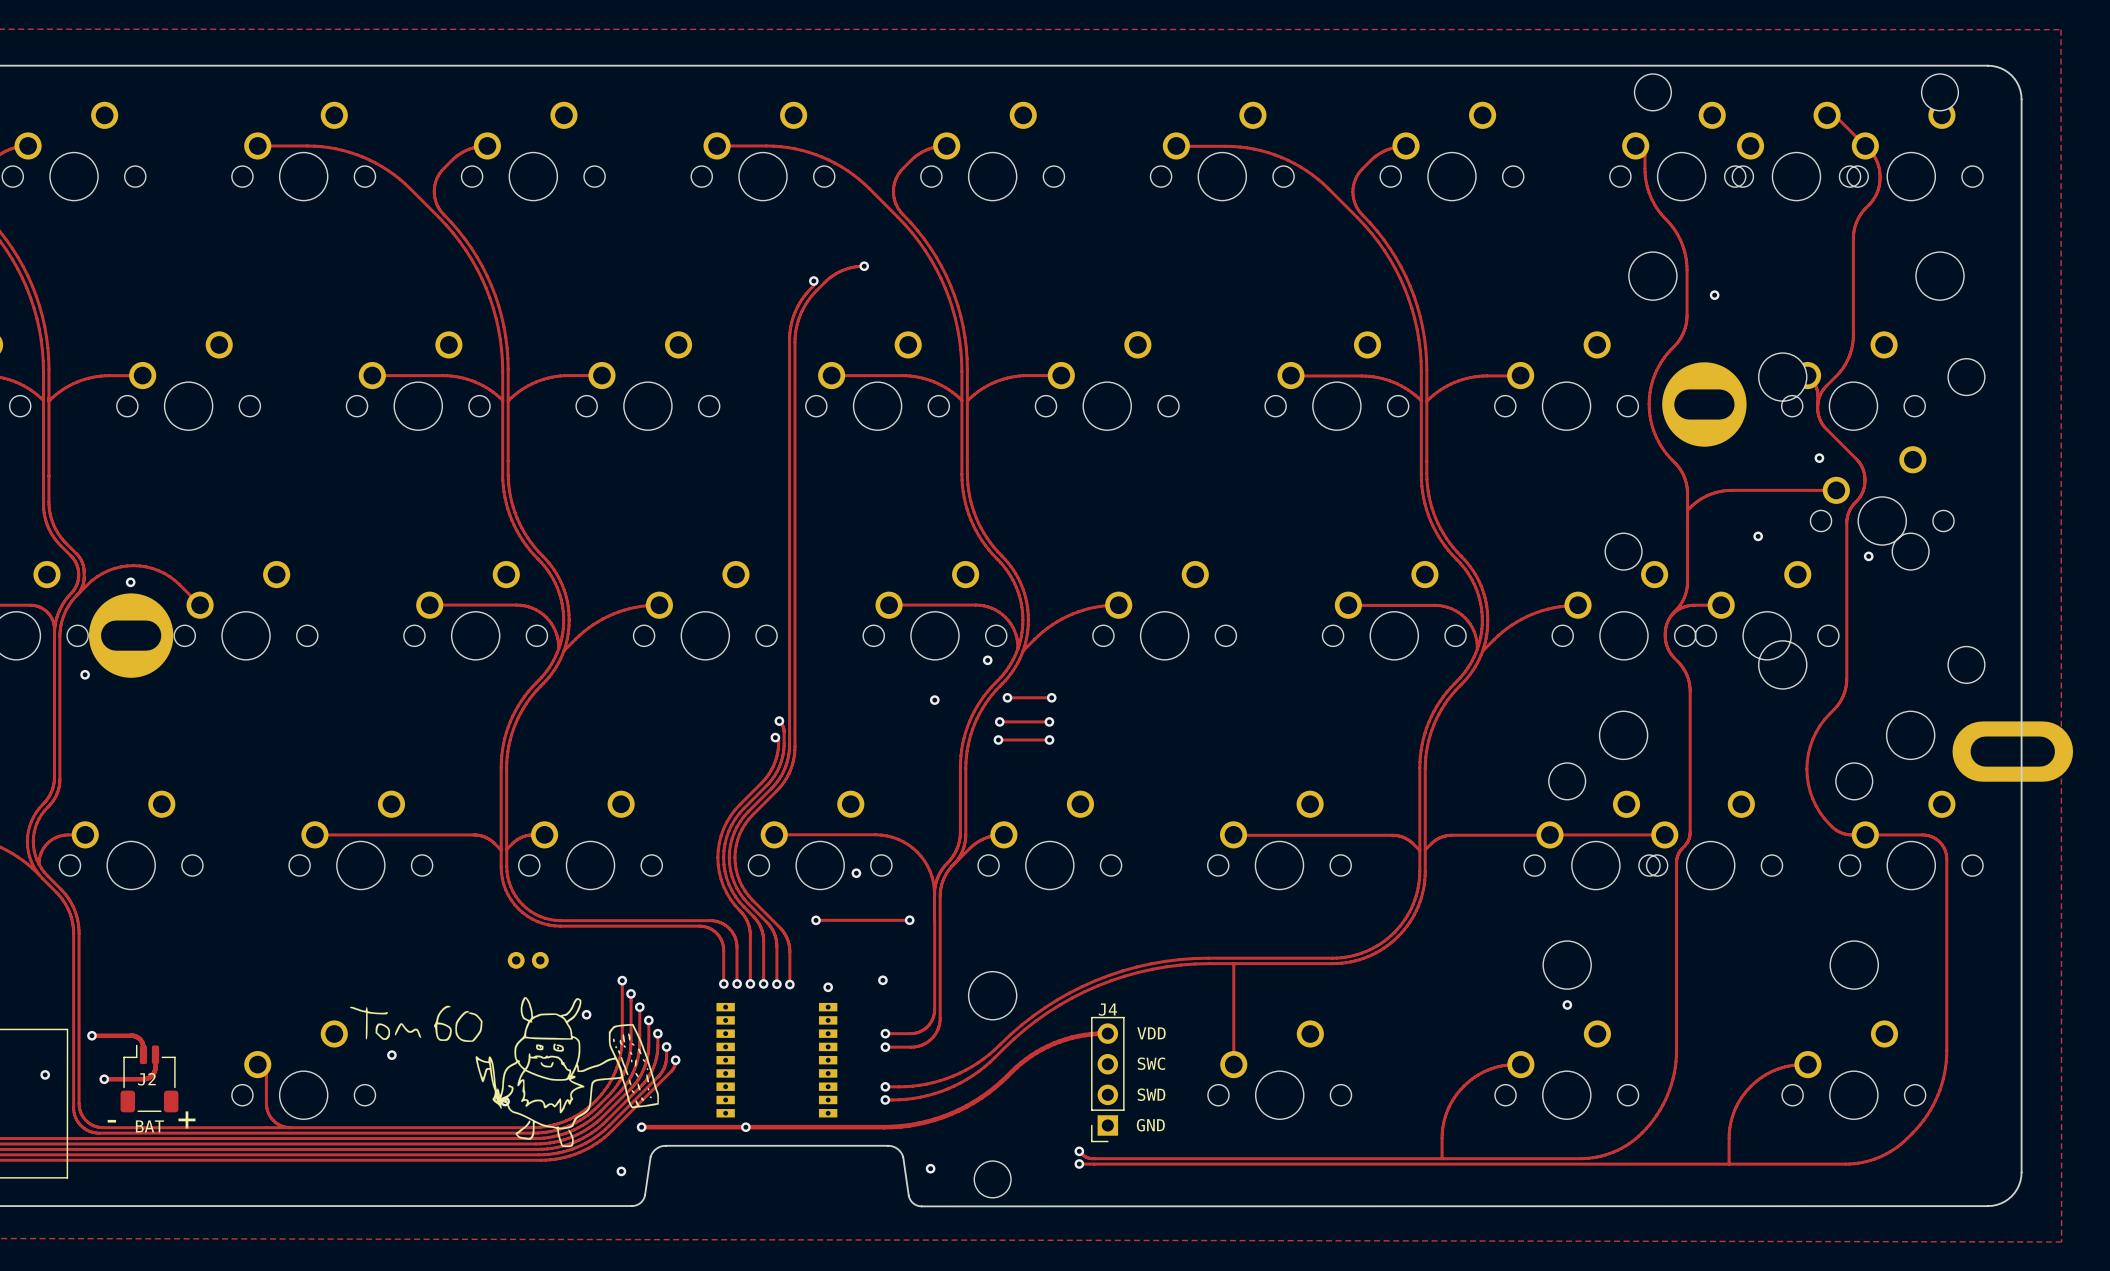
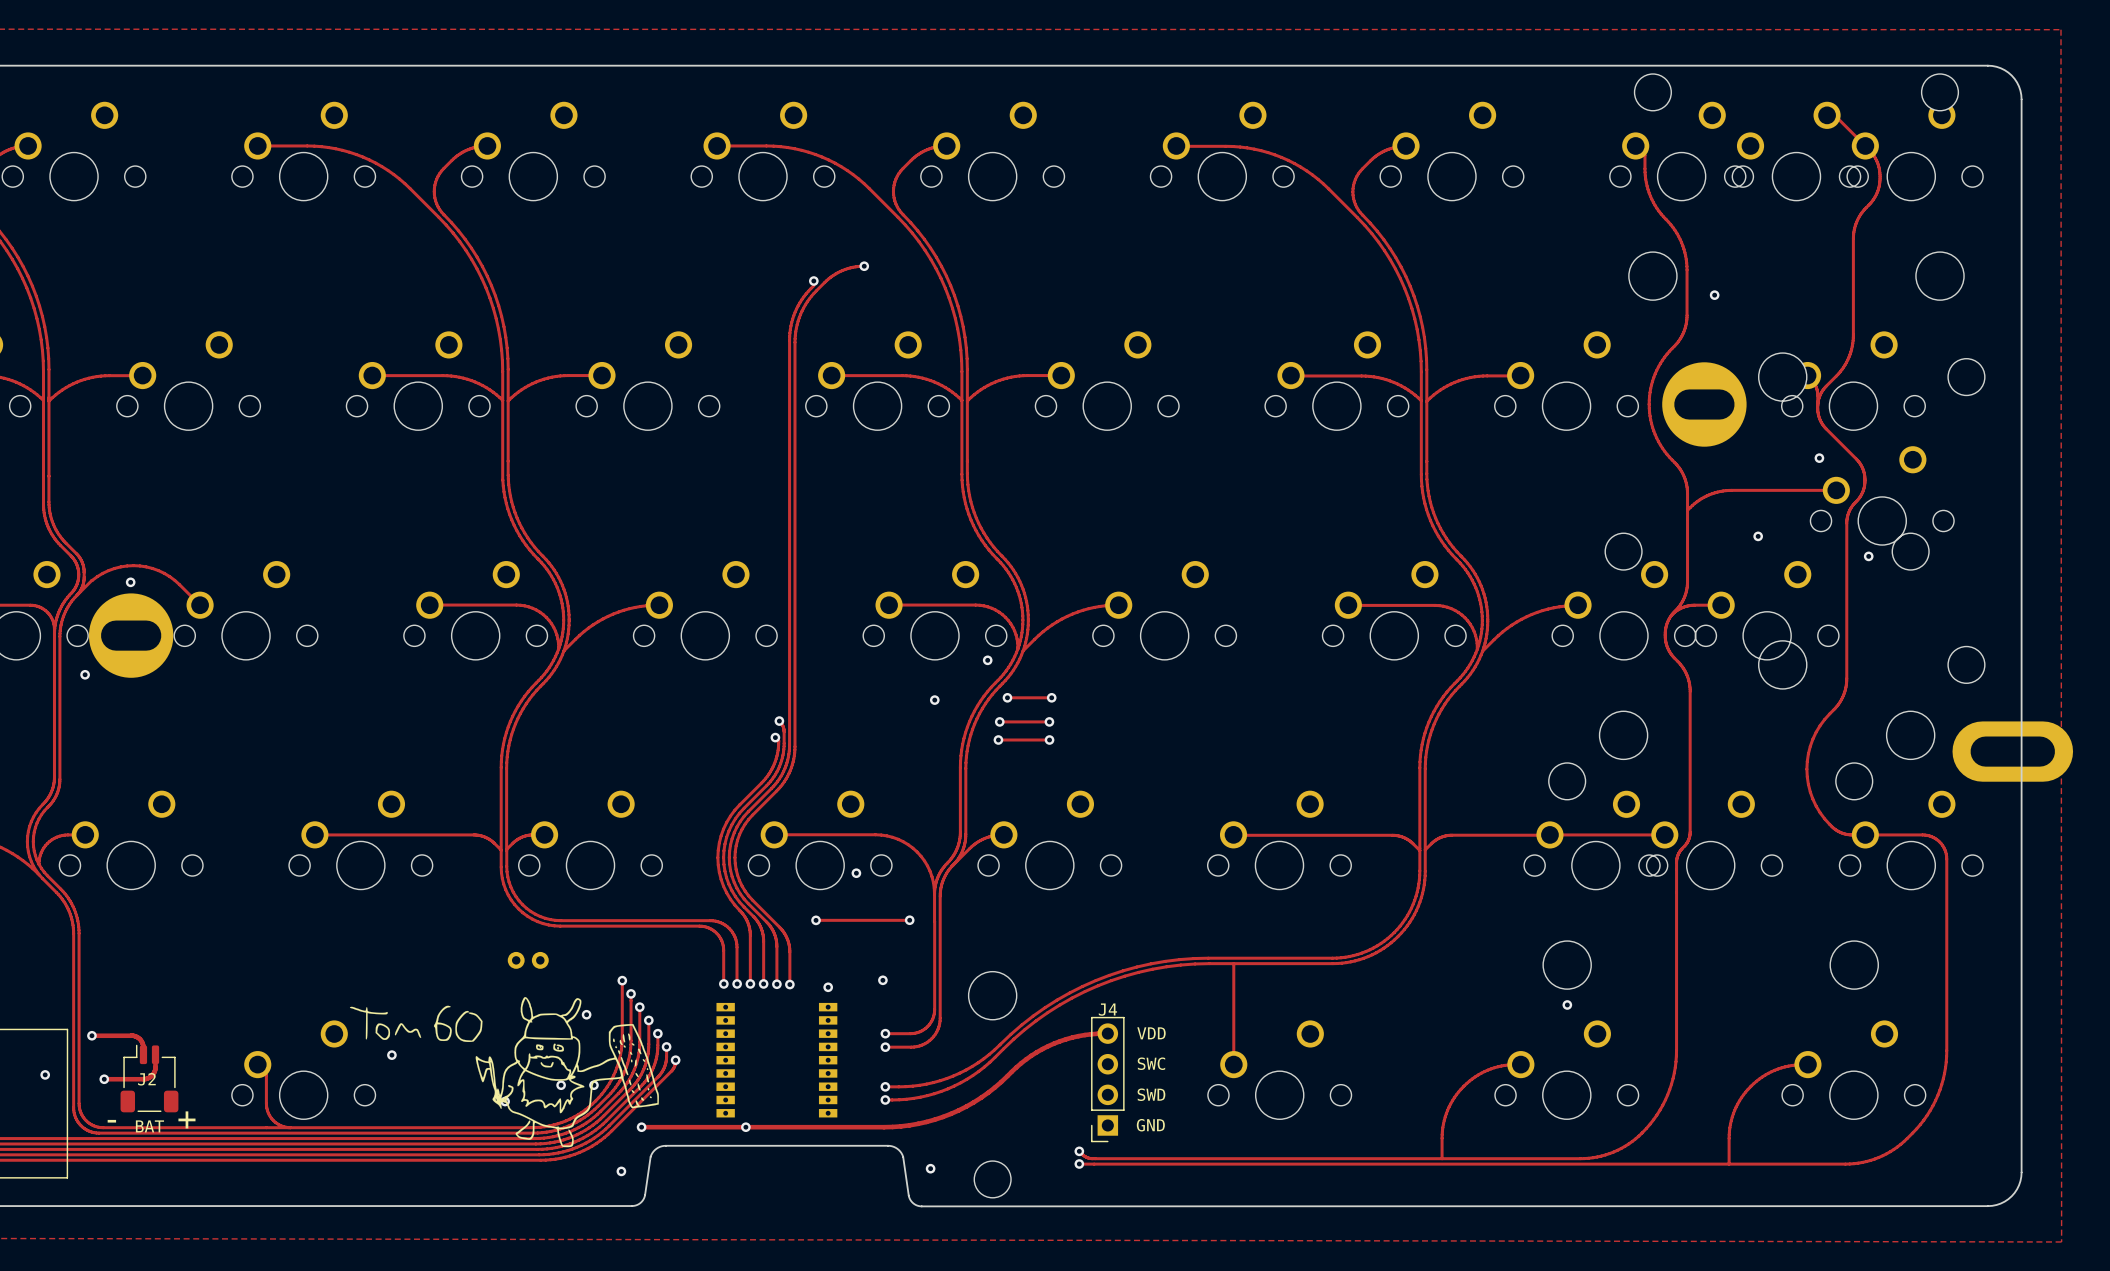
via: none -> (561, 1085)
via: none -> (593, 1085)

